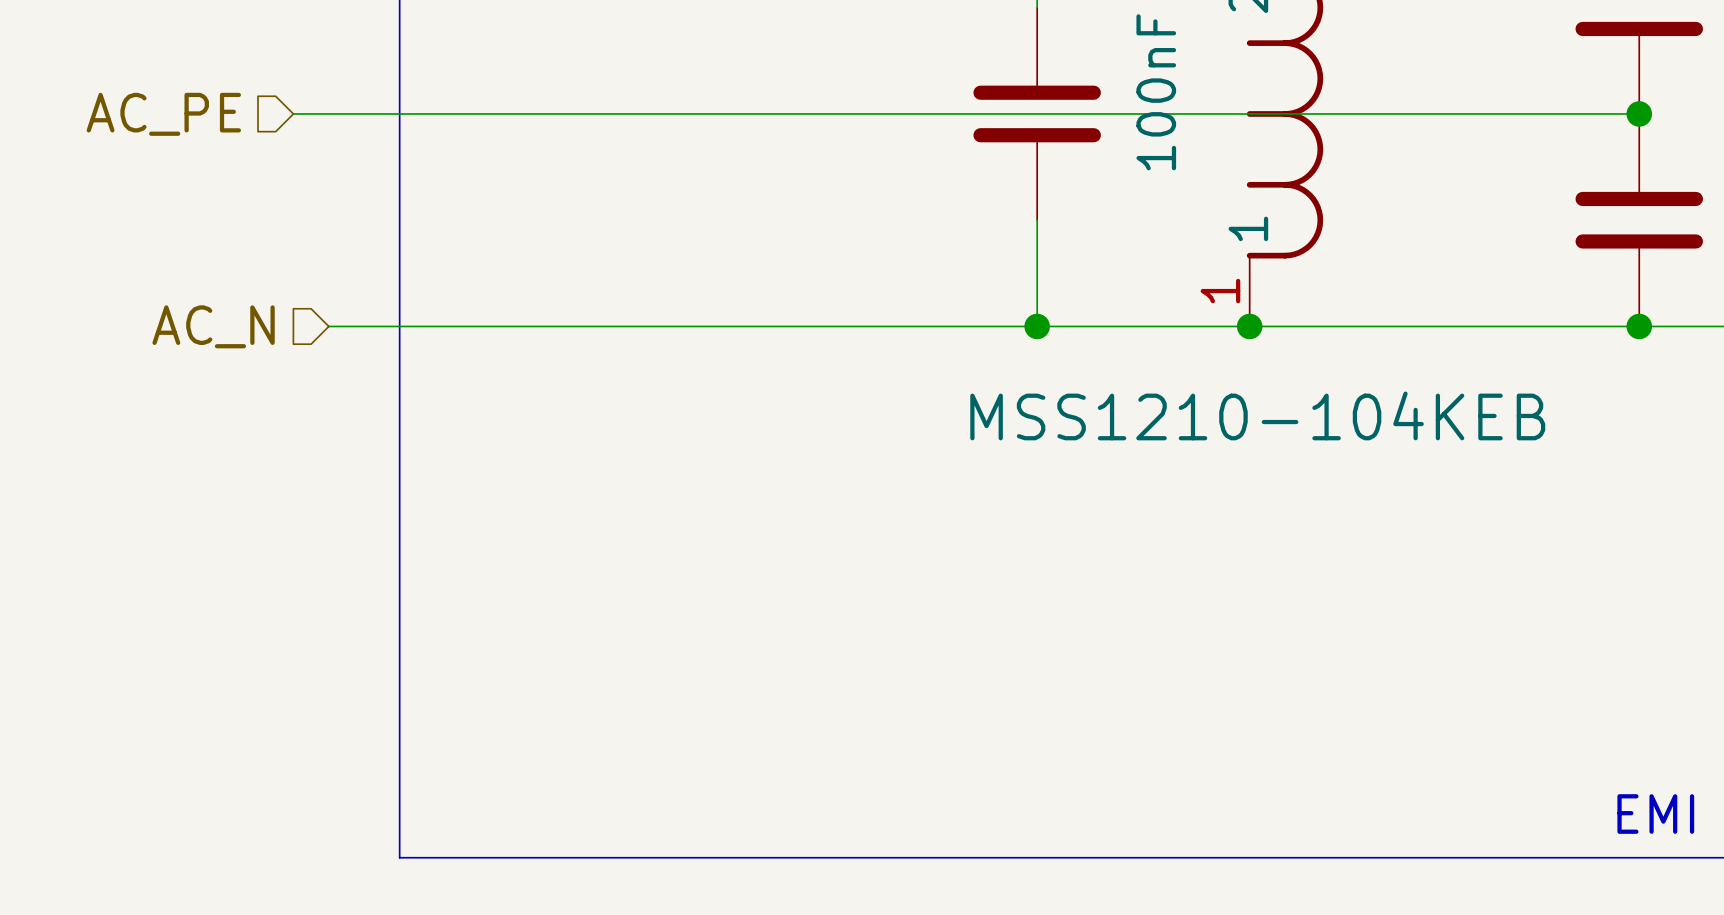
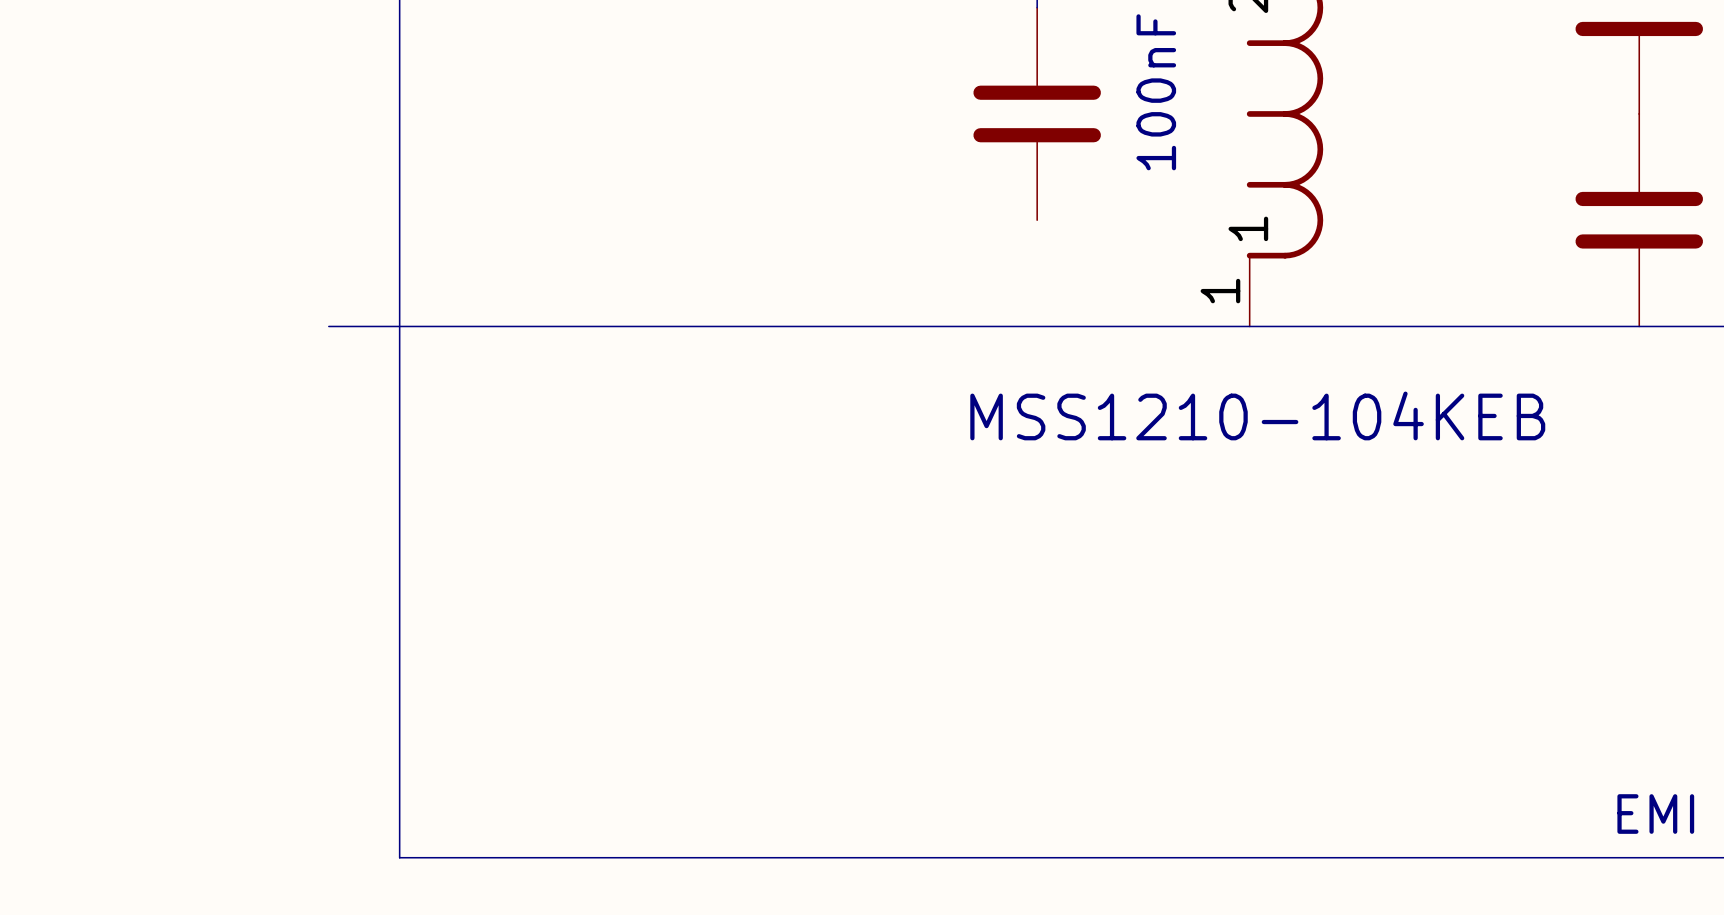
wire: (293, 113) (1639, 113) -> none
junction: (1639, 113) -> none
hierarchical label: AC_PE (163, 114) -> none
wire: (1037, 220) (1037, 326) -> none
hierarchical label: AC_N (213, 326) -> none
junction: (1037, 326) -> none
junction: (1249, 326) -> none
junction: (1639, 326) -> none

